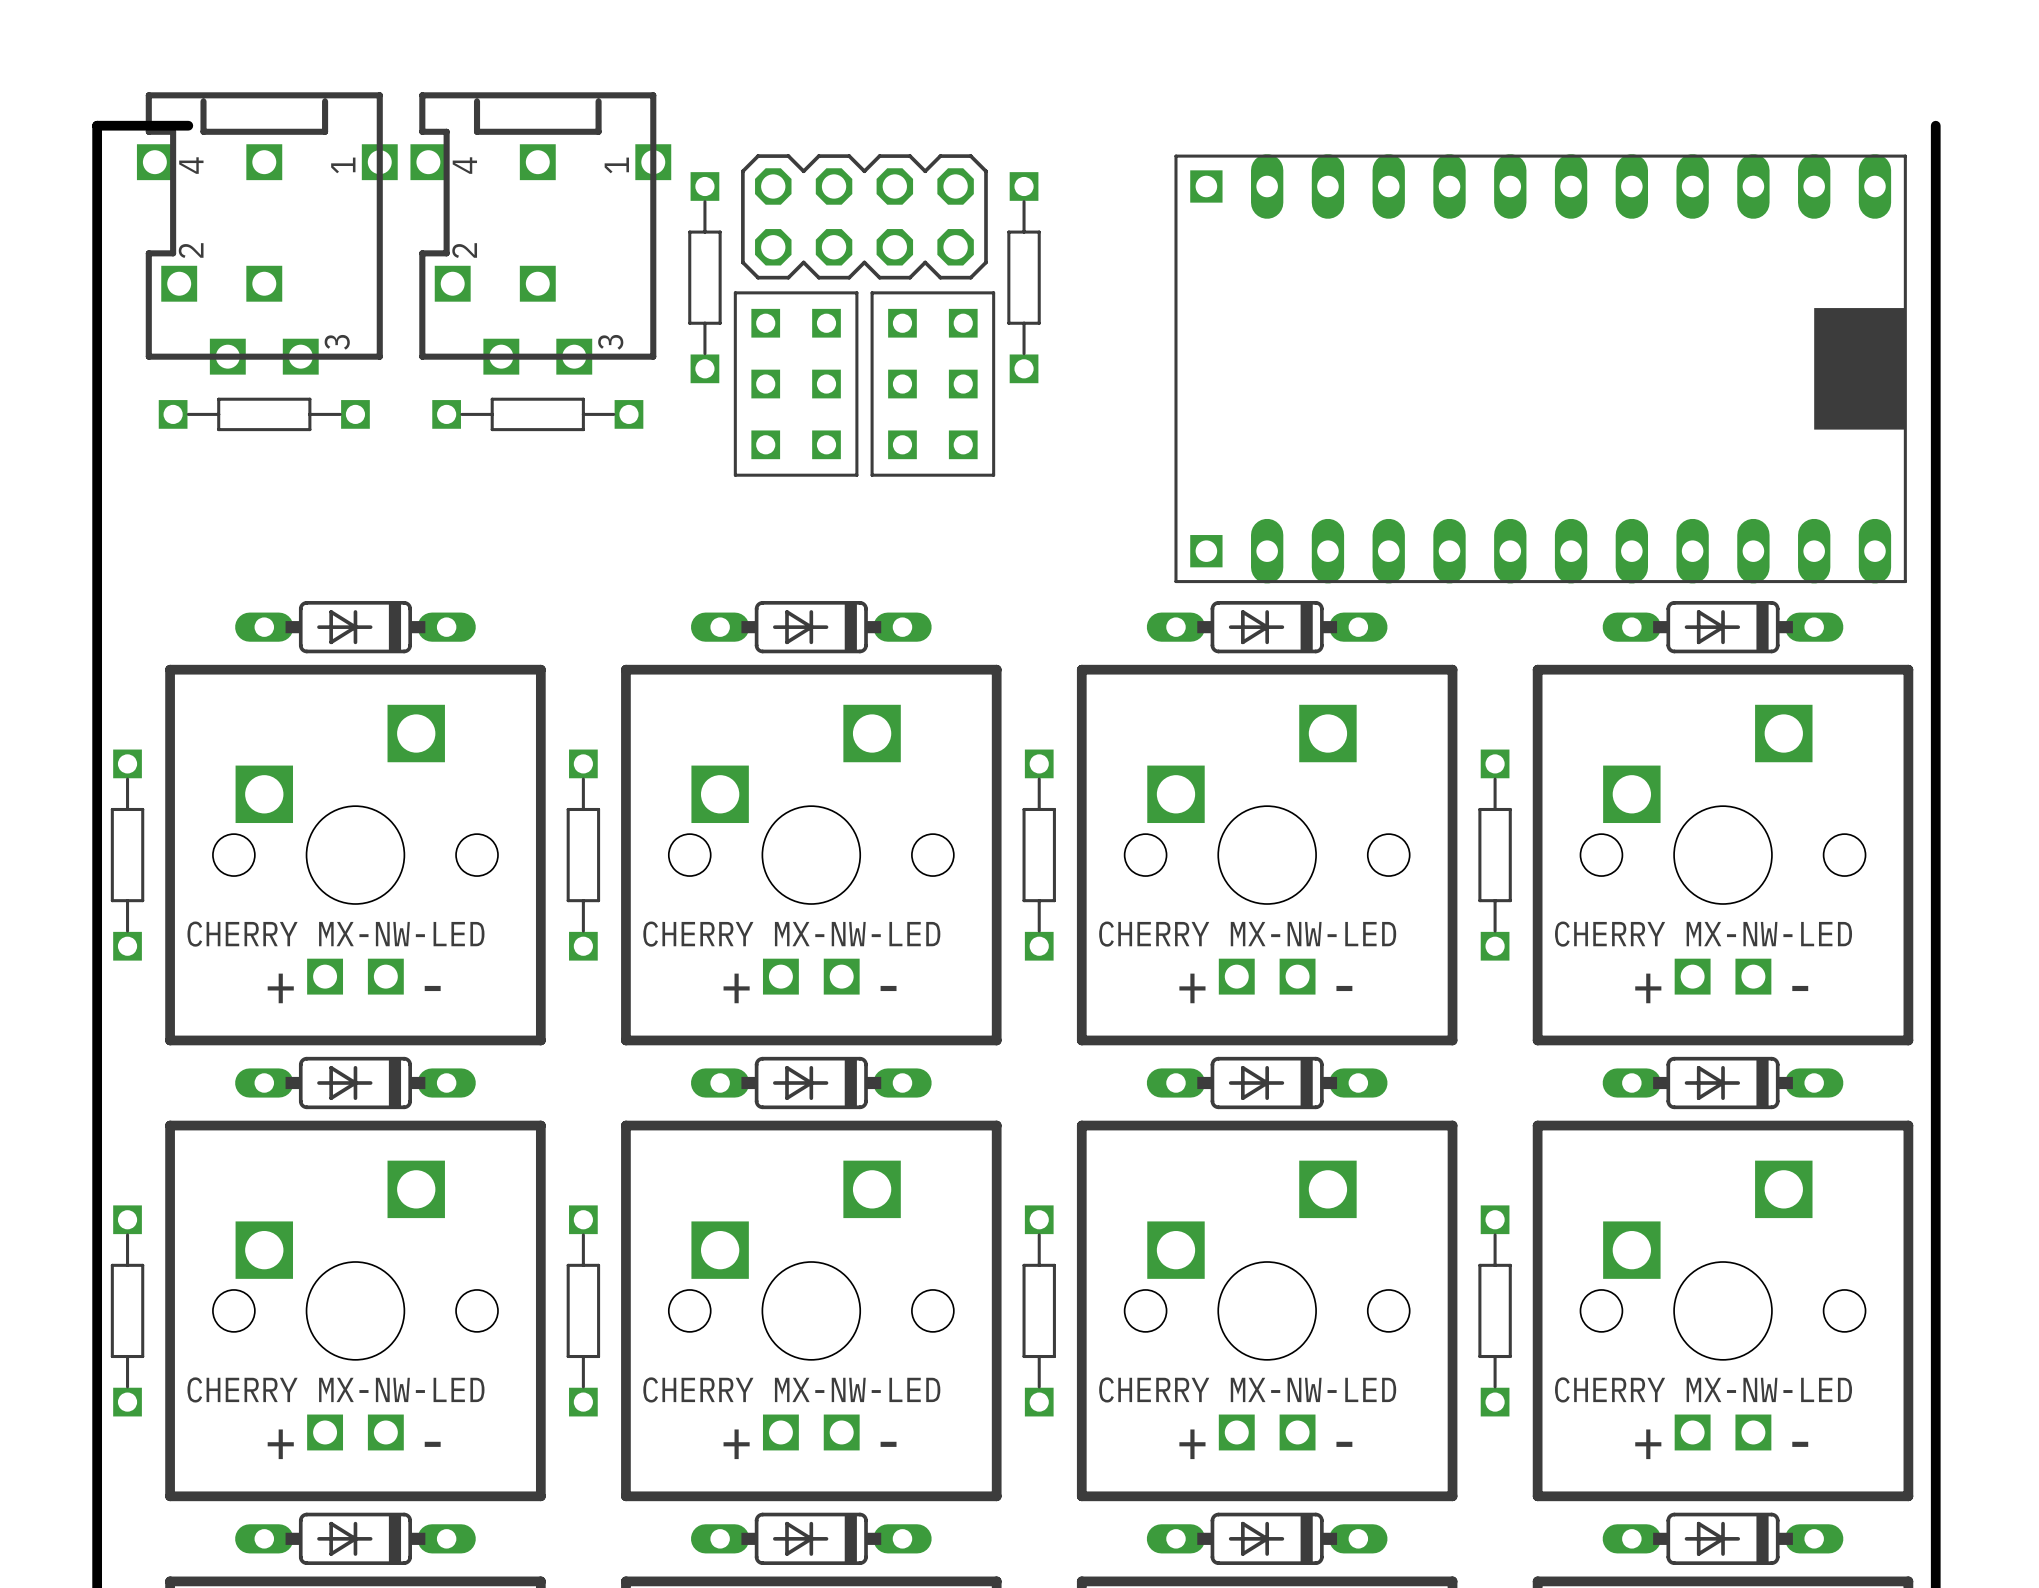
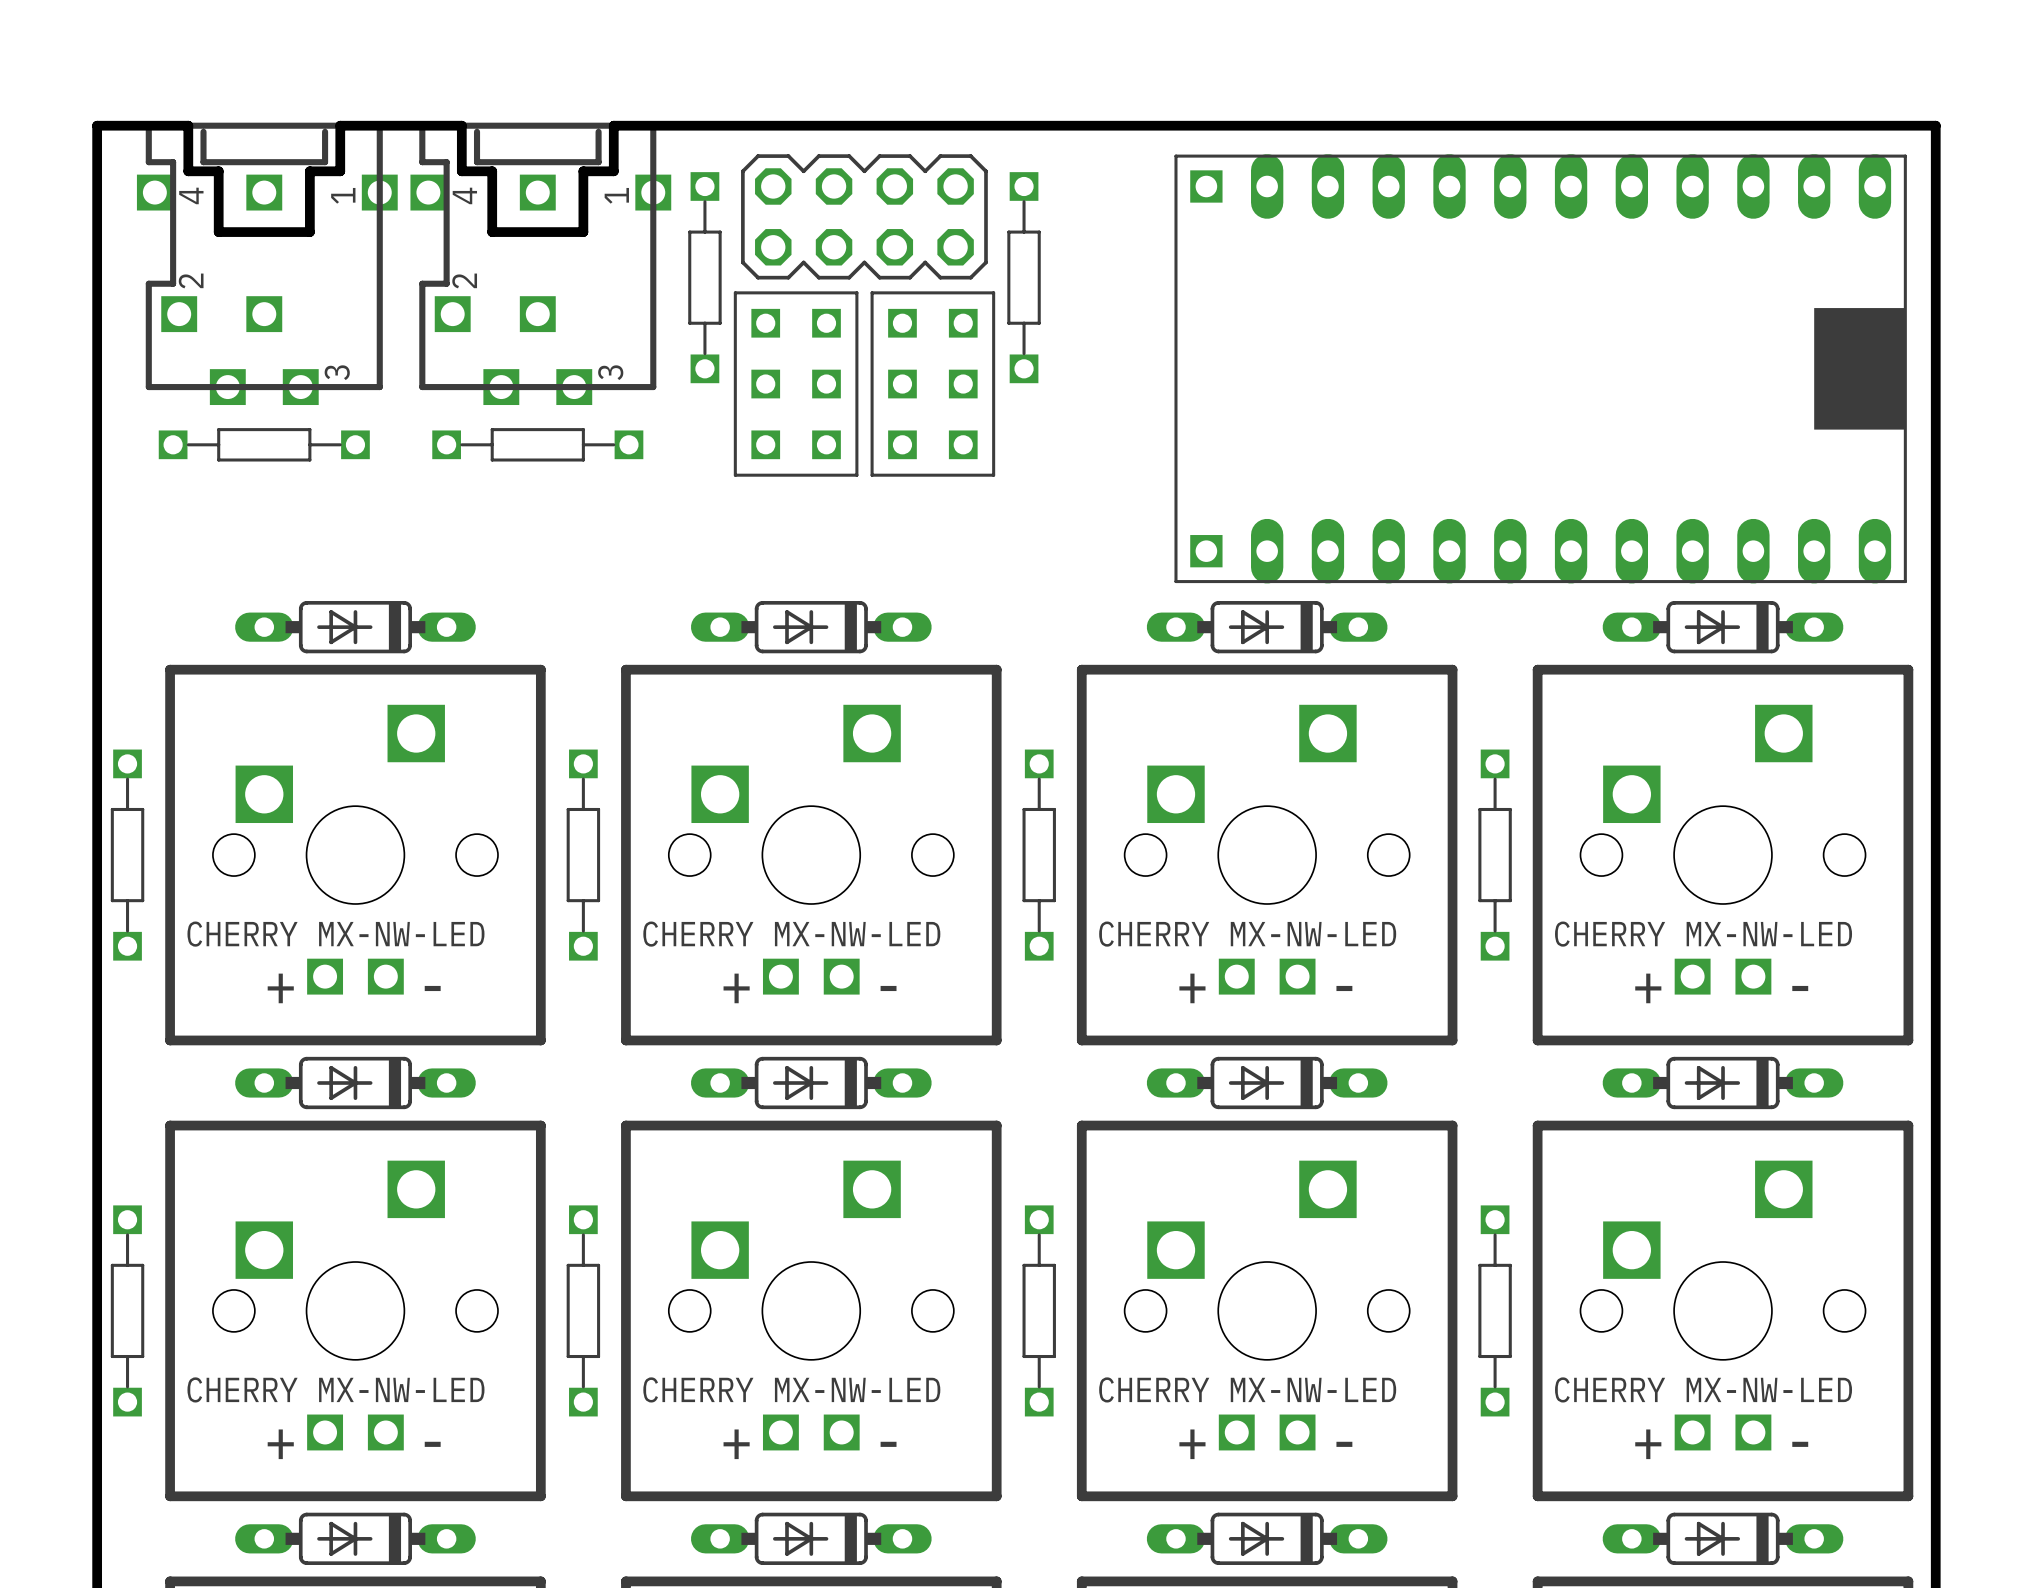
board edge: none -> (188, 125) (188, 171) (218, 171) (218, 232) (309, 232) (309, 171) (340, 171) (340, 125) (461, 125) (461, 171) (492, 171) (492, 232) (583, 232) (583, 171) (613, 171) (613, 125) (1935, 125)
part position: (267, 233) -> (267, 263)
part position: (540, 233) -> (540, 263)
part position: (264, 414) -> (264, 444)
part position: (537, 414) -> (537, 444)

